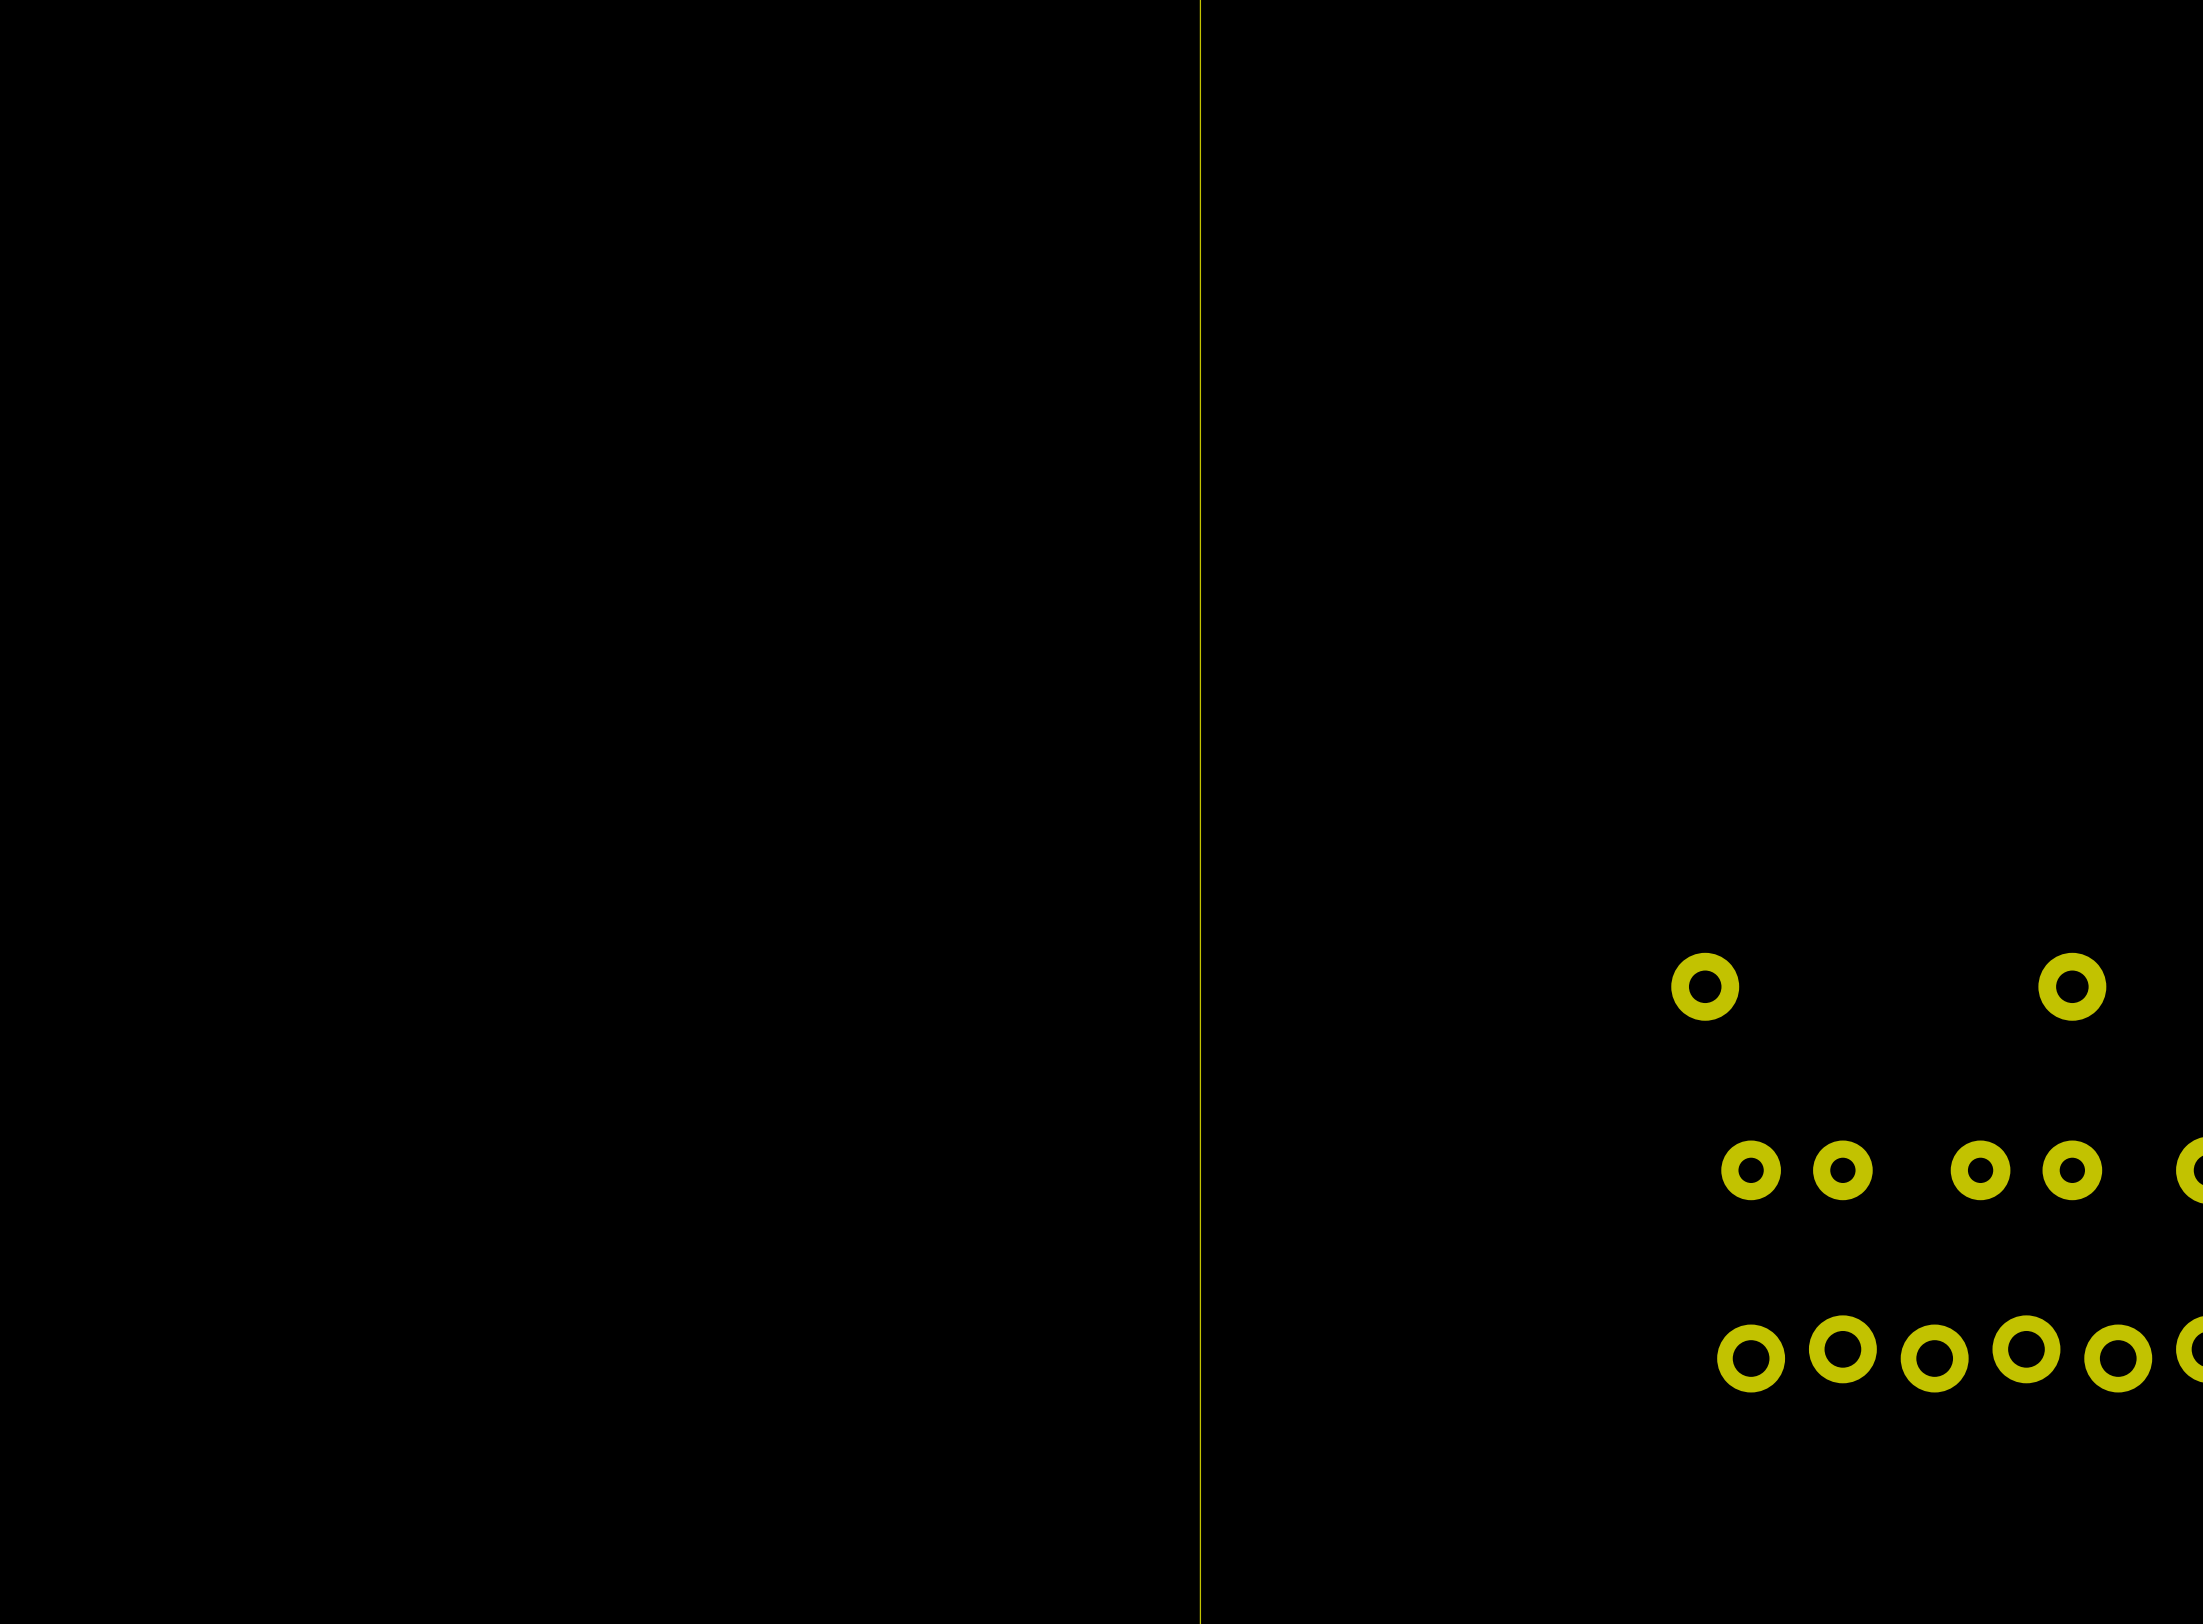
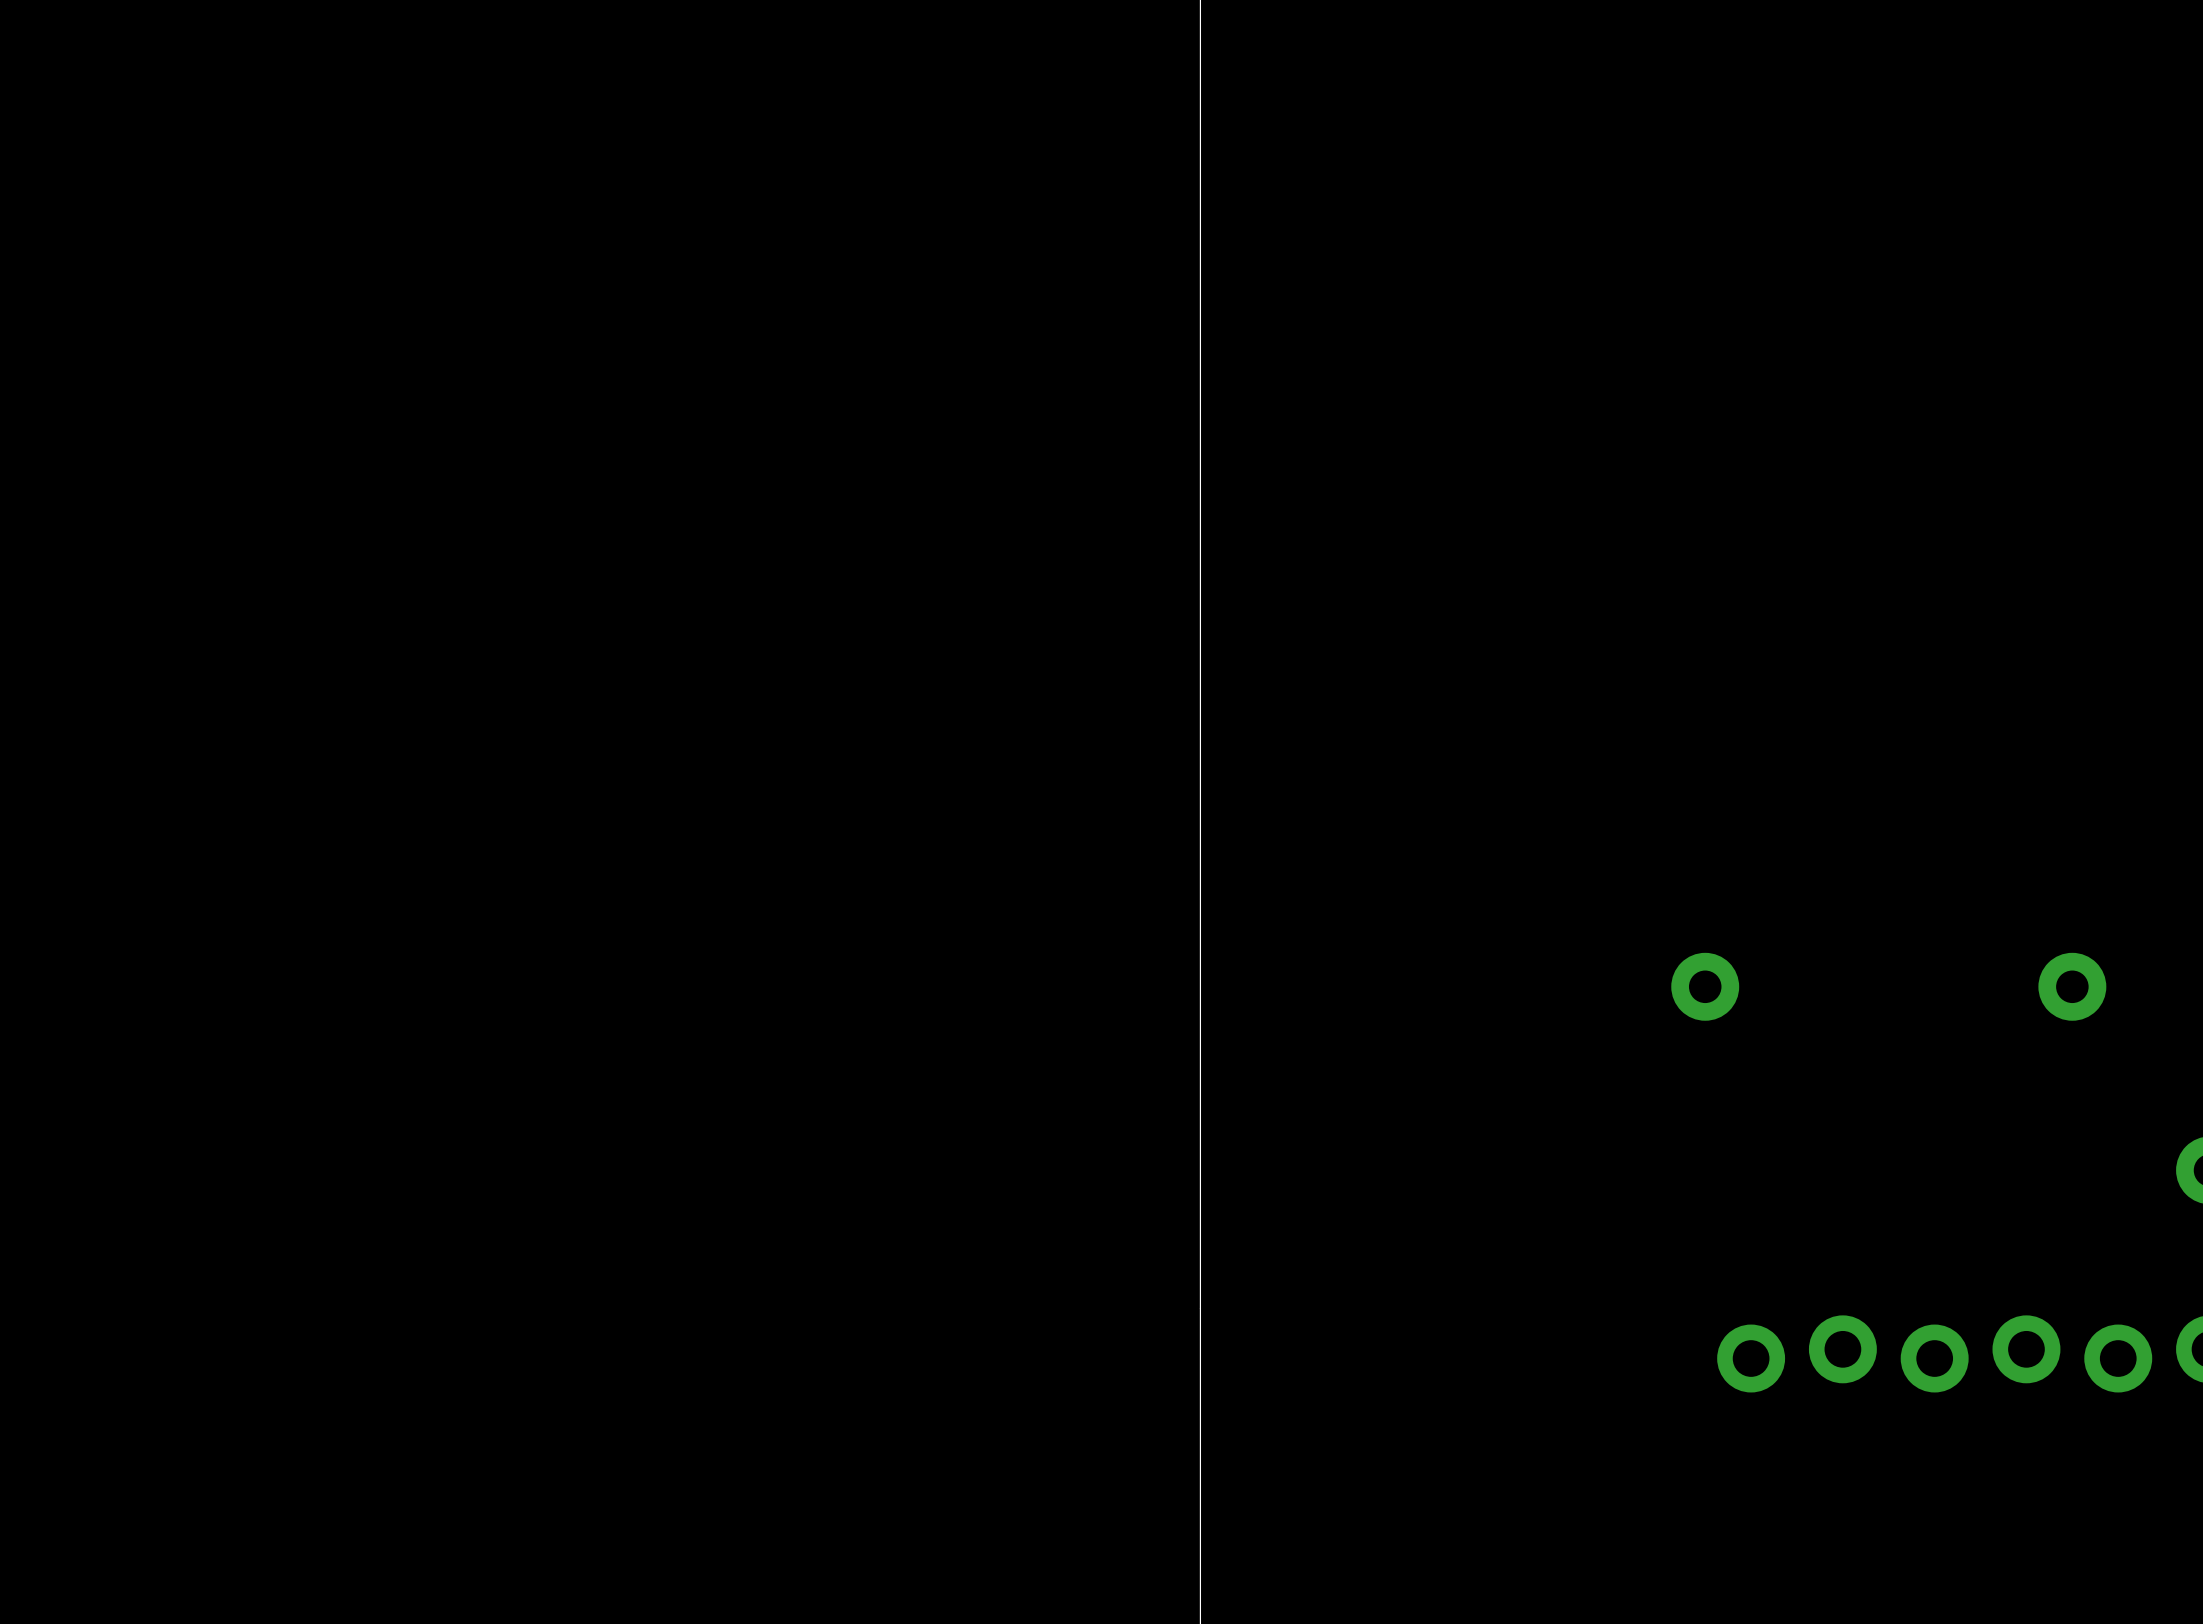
part: (1797, 1170) -> none
part: (2026, 1170) -> none

